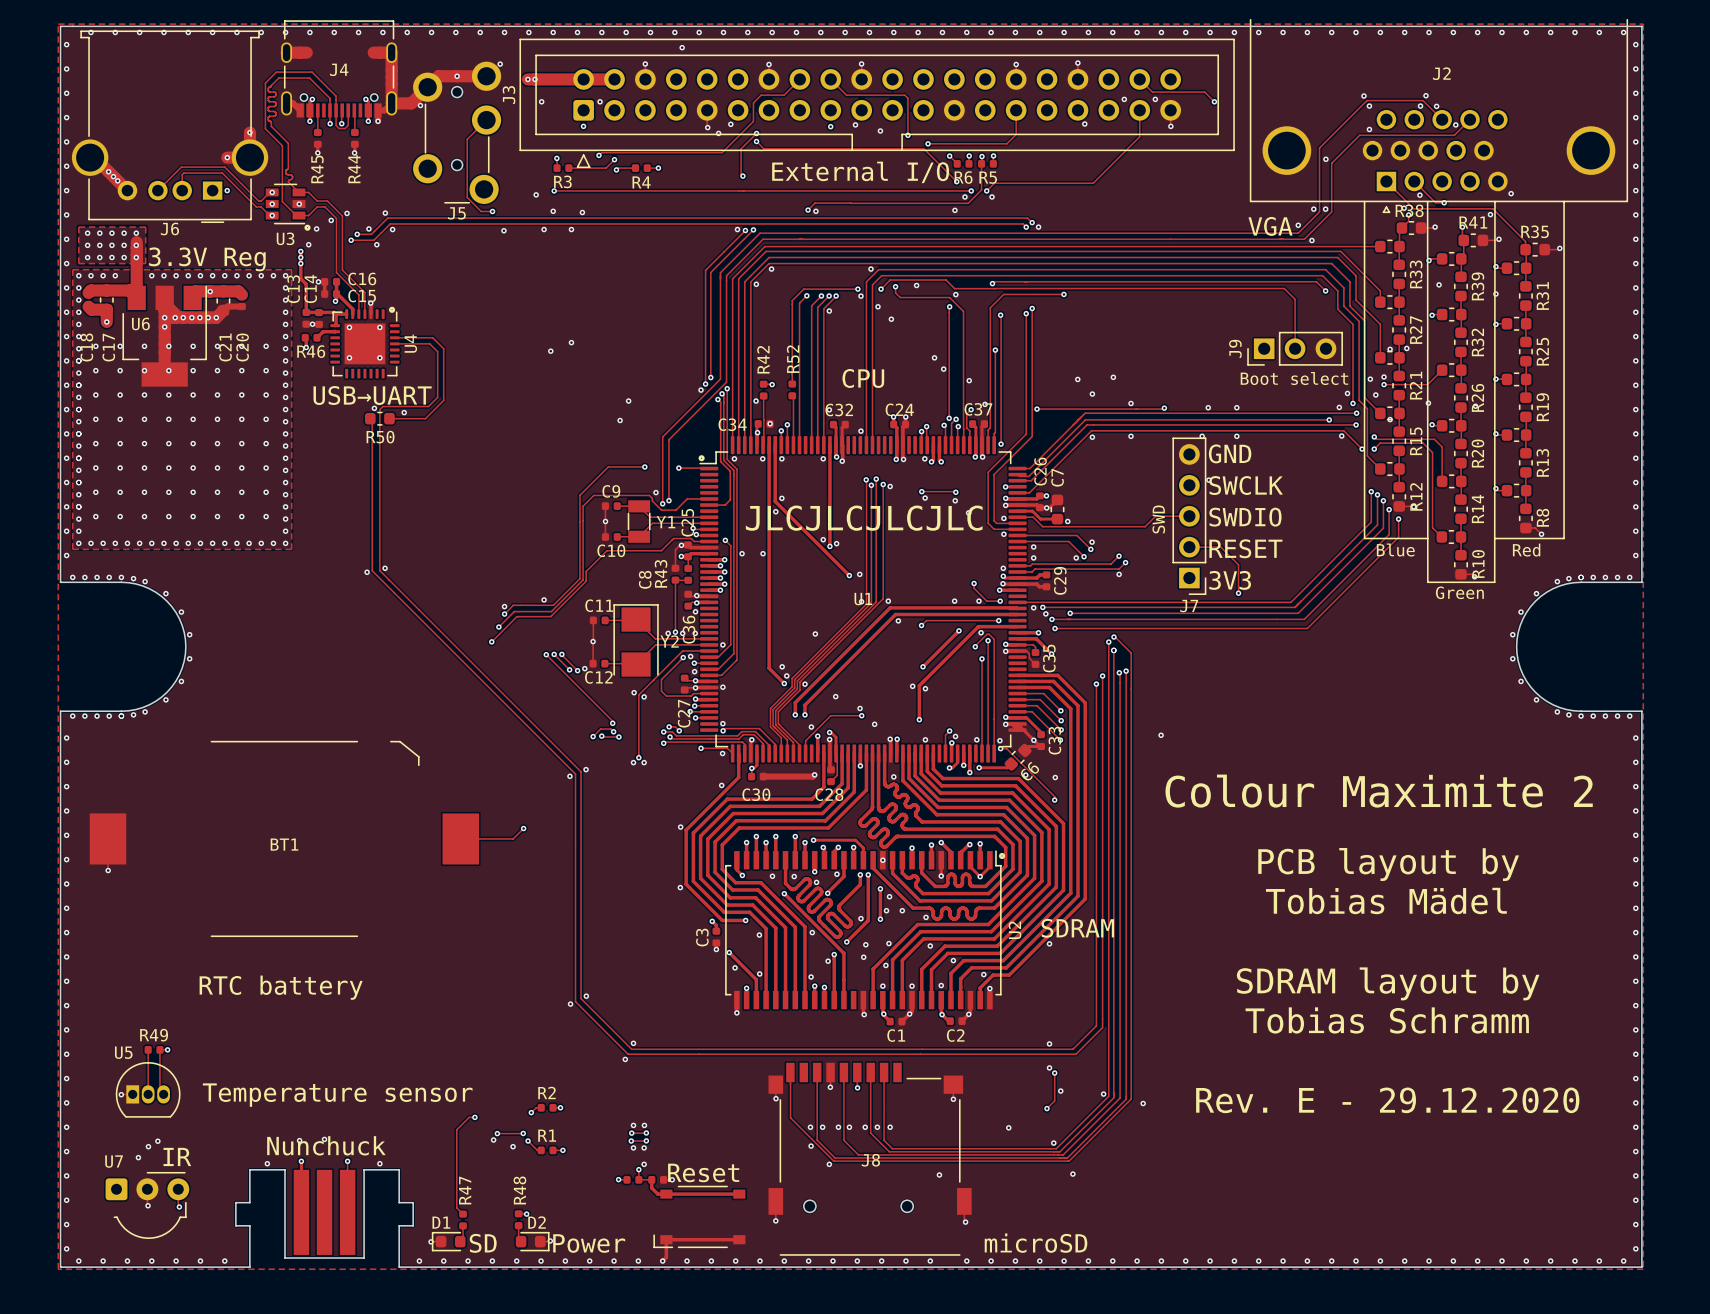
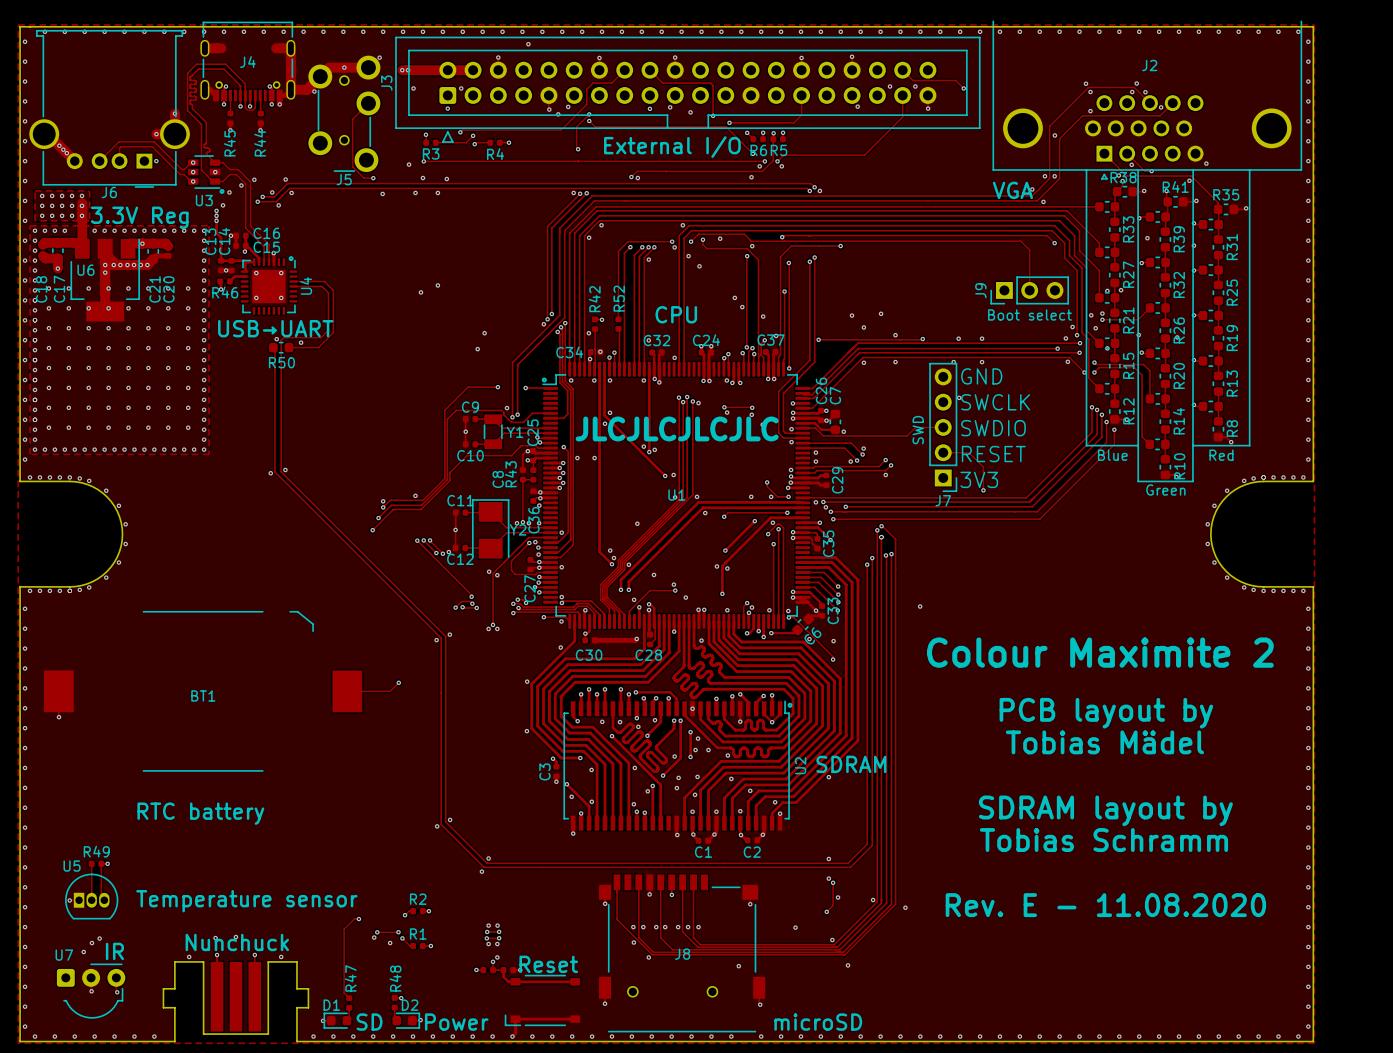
text: Rev. E - 29.12.2020 (1387, 1100) -> Rev. E - 11.08.2020 (1105, 905)

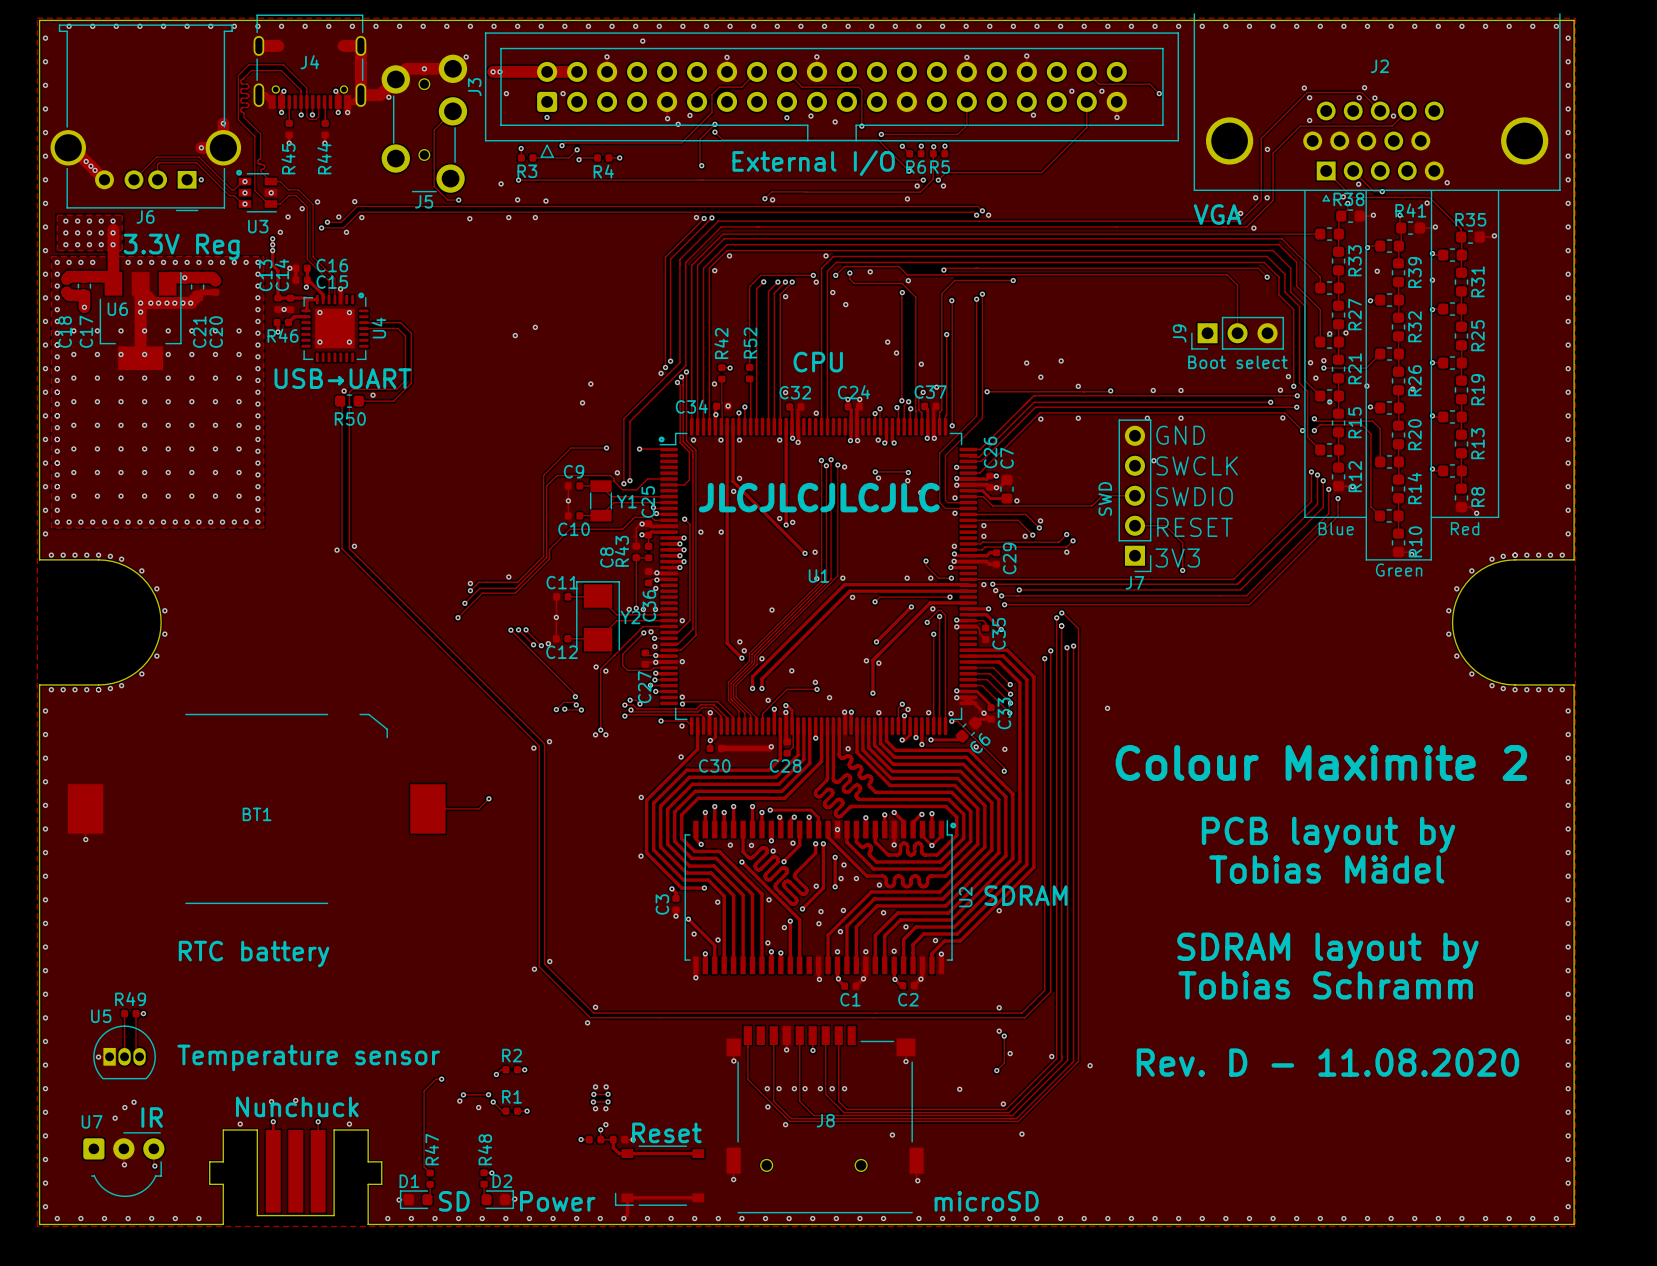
drawing position: (222, 191) -> (239, 172)
text: Rev. E - 11.08.2020 (1105, 905) -> Rev. D - 11.08.2020 (1327, 1062)

